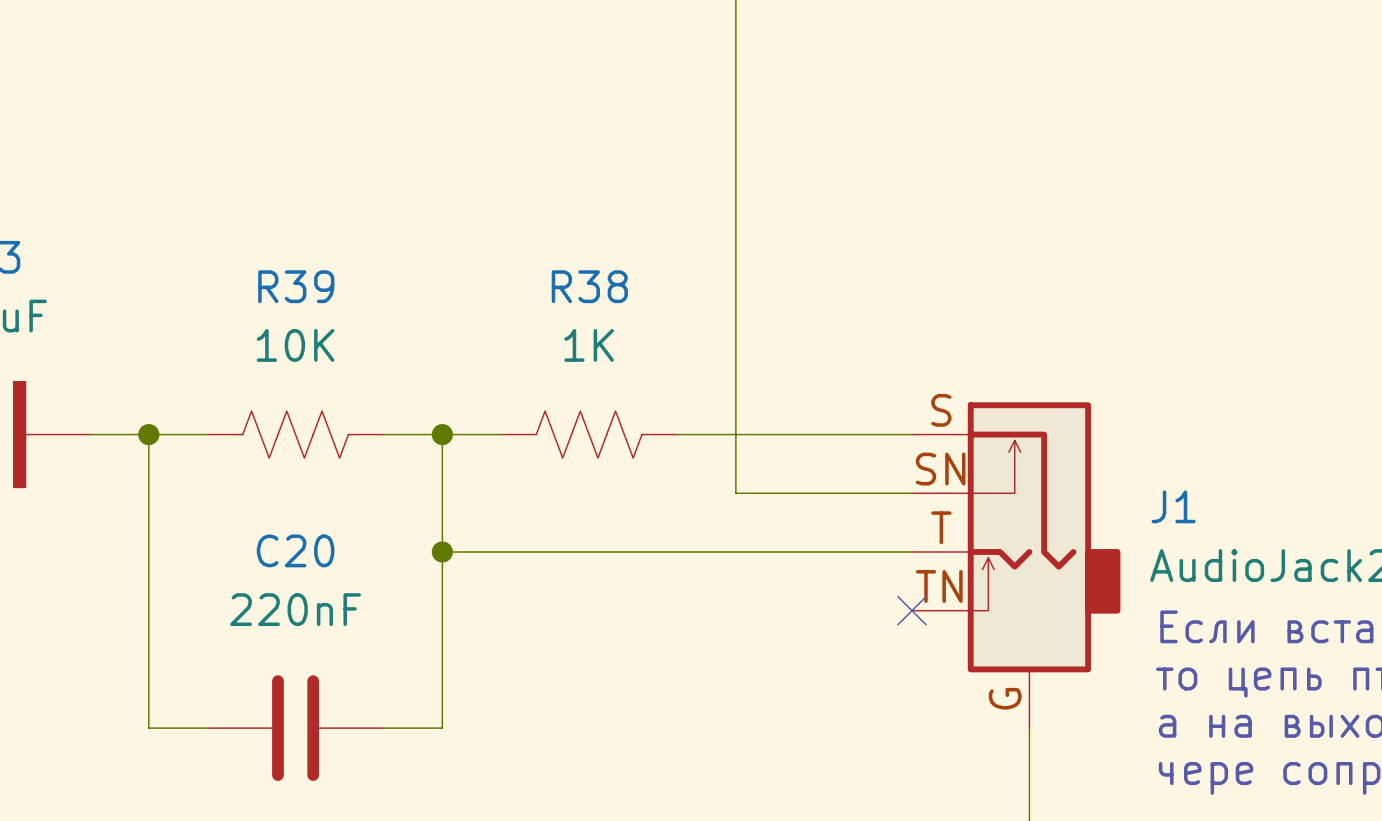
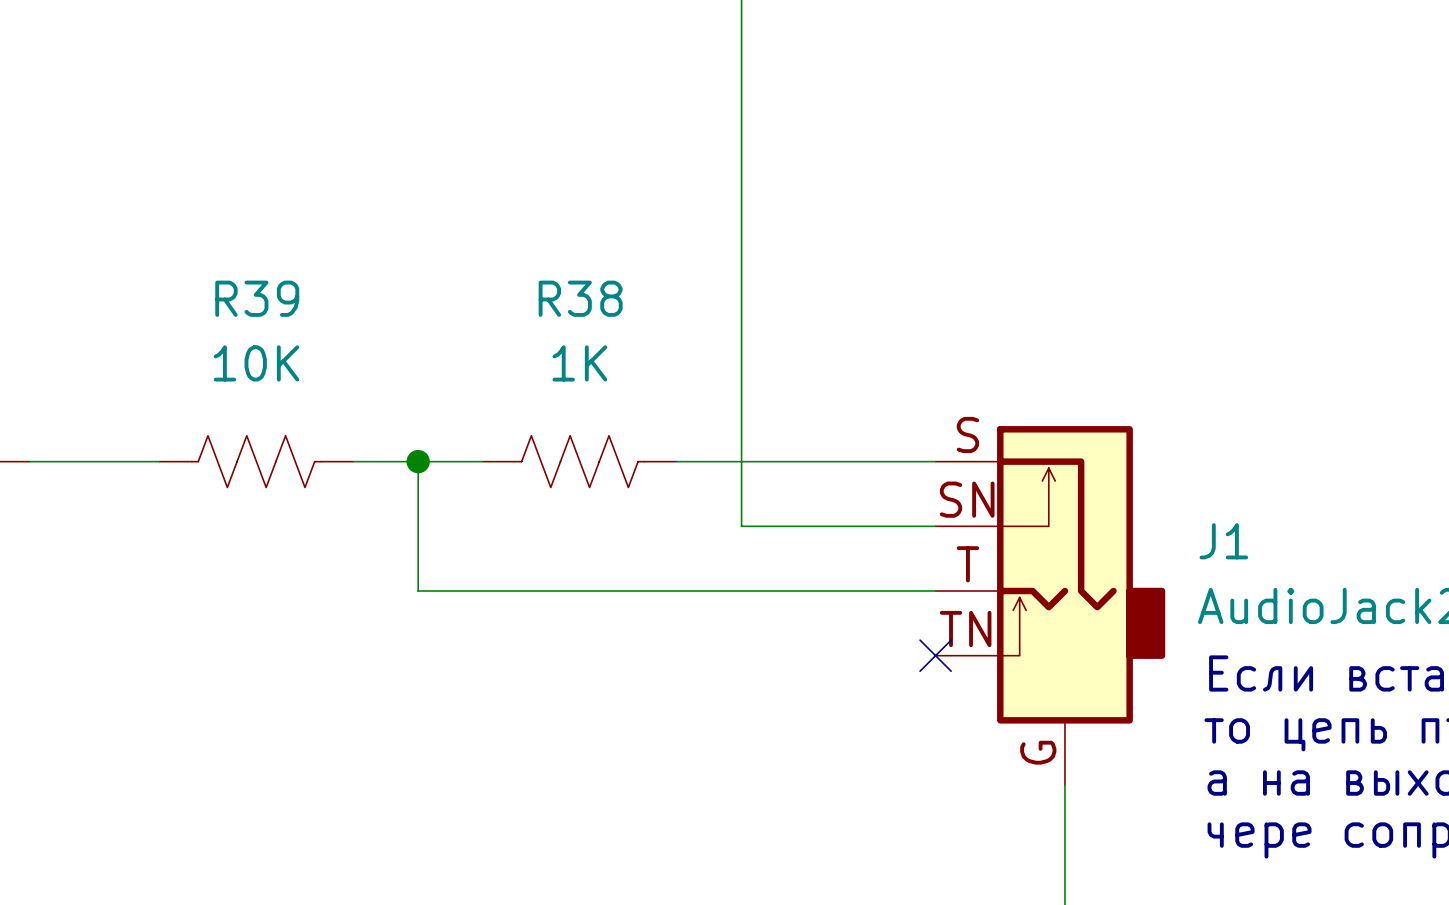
wire: (148, 434) (148, 728) (207, 728) -> none
junction: (148, 434) -> none
wire: (442, 551) (442, 728) (383, 728) -> none
junction: (442, 551) -> none
C20: 220nF (295, 728) -> none

